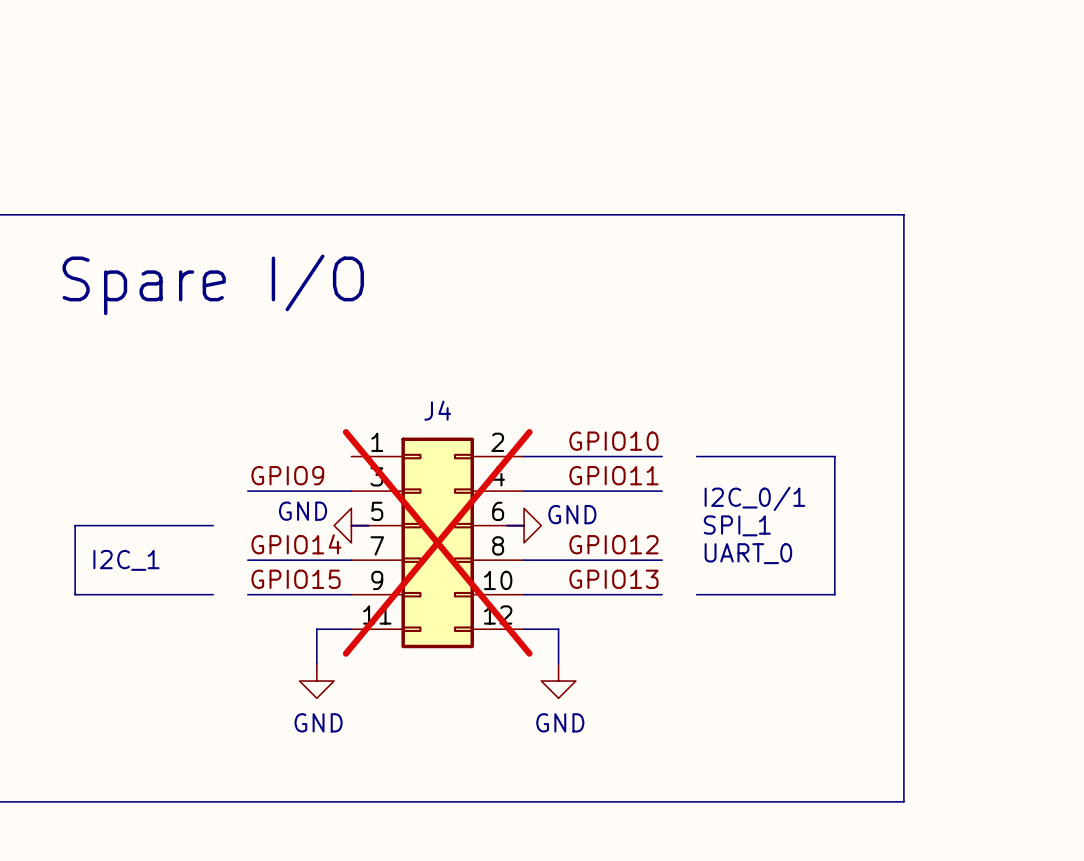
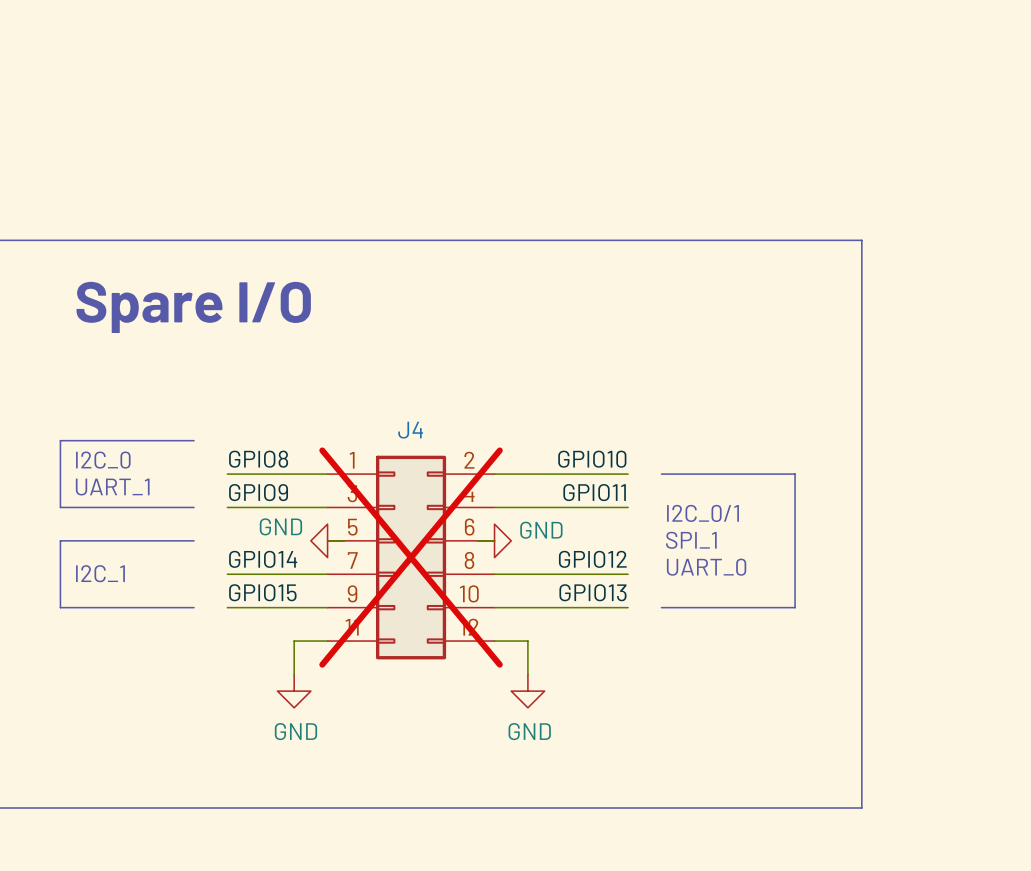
line: none -> (194, 440) (60, 440) (60, 507) (194, 507)
label: none -> GPIO8 (258, 459)
text: none -> I2C_0 (103, 460)
wire: none -> (227, 474) (327, 474)
text: none -> UART_1 (112, 487)

